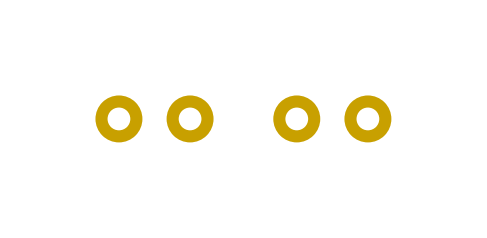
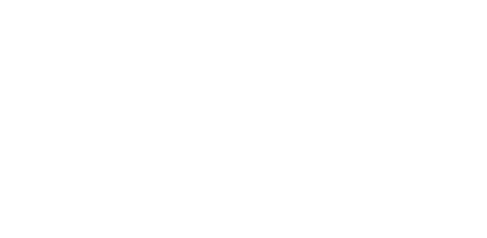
part: (154, 118) -> none
part: (332, 118) -> none

